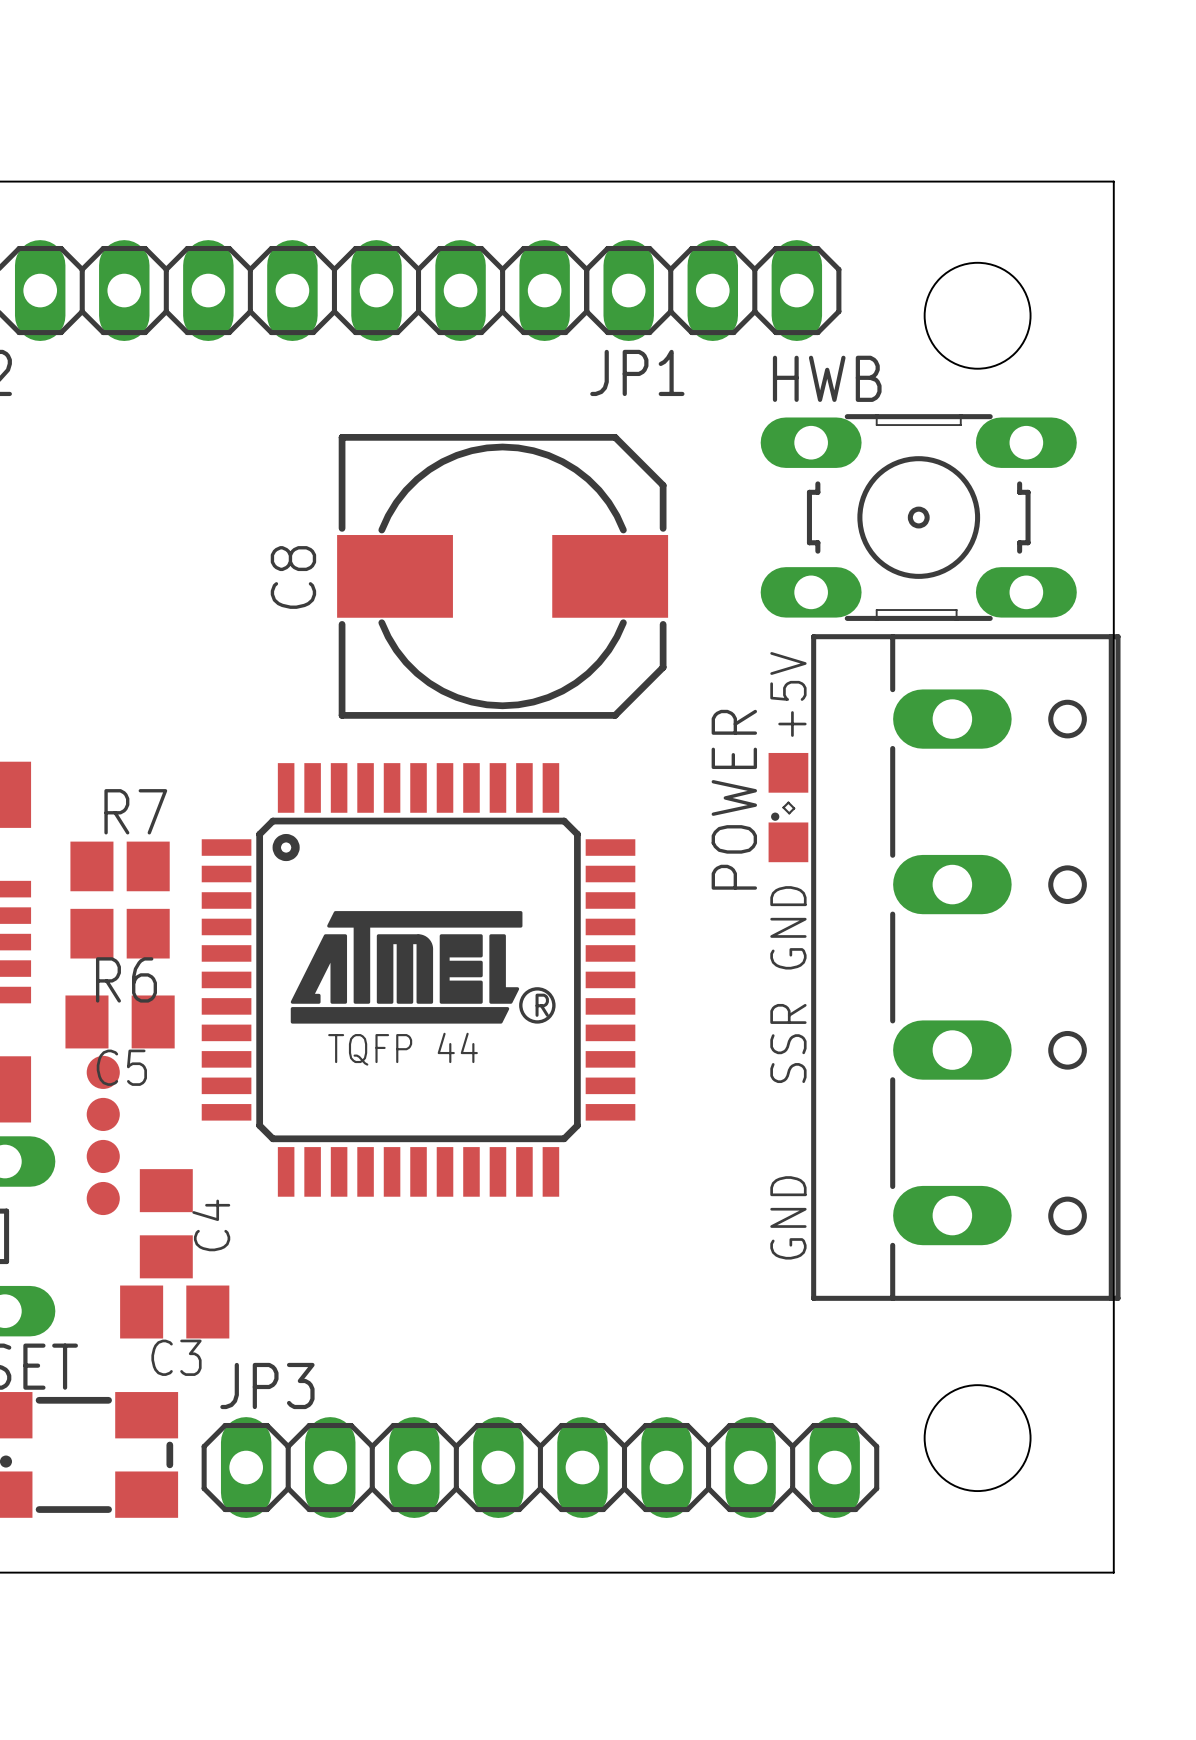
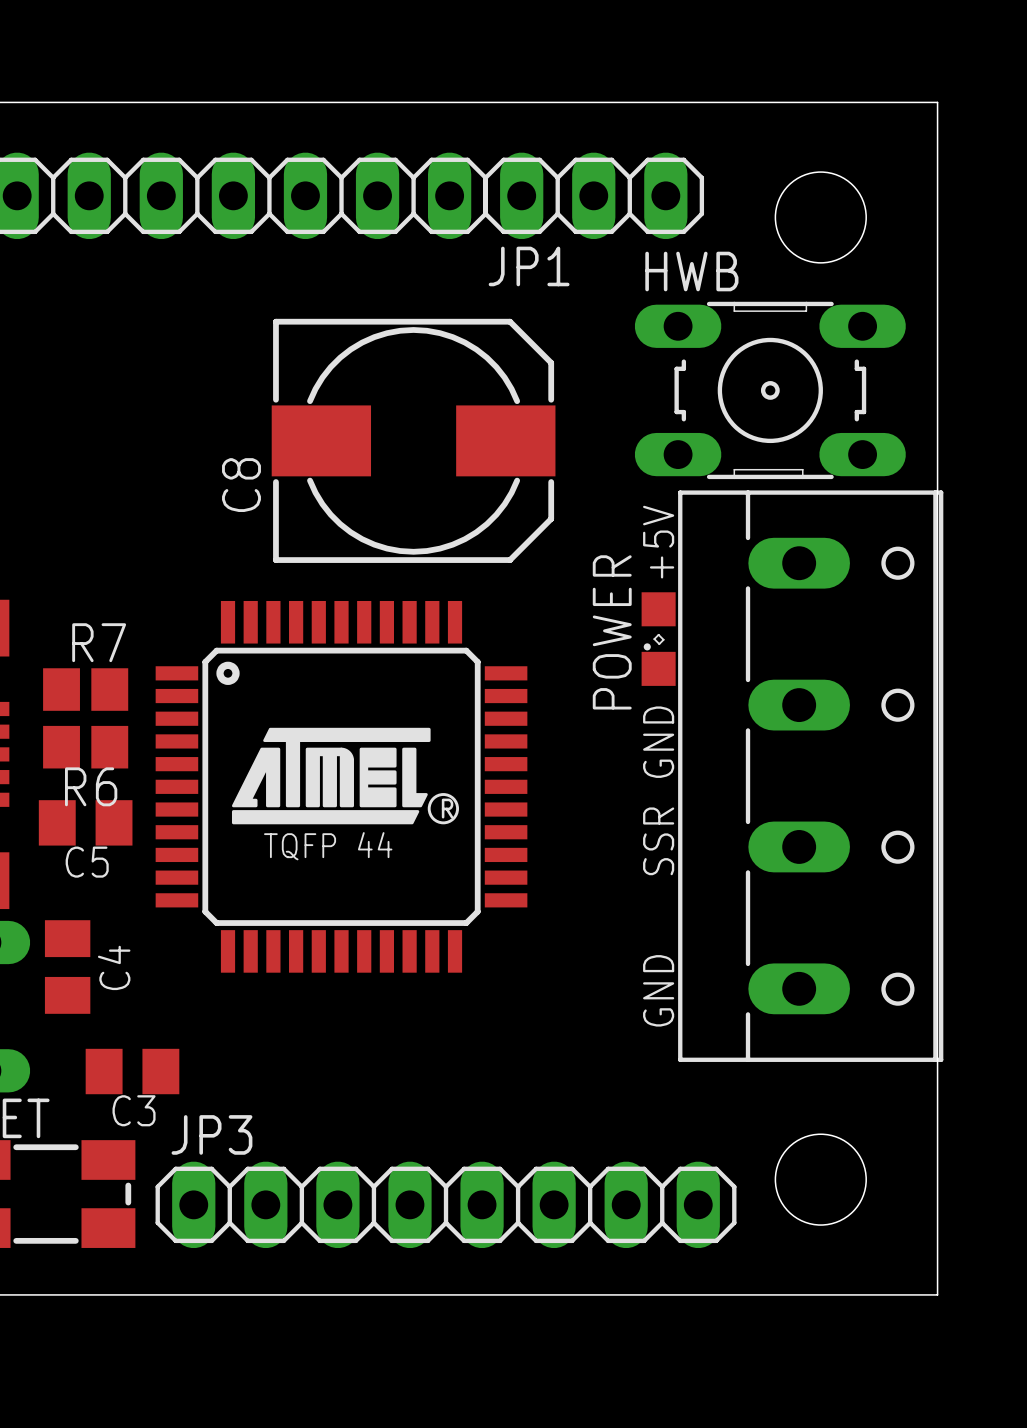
C8 name position: C8 (293, 577) -> C8 (241, 485)
part: (103, 1072) -> none
part: (103, 1114) -> none
part: (103, 1156) -> none
part: (103, 1198) -> none
C4 position: (166, 1223) -> (67, 967)
C4 name position: C4 (211, 1225) -> C4 (114, 967)

